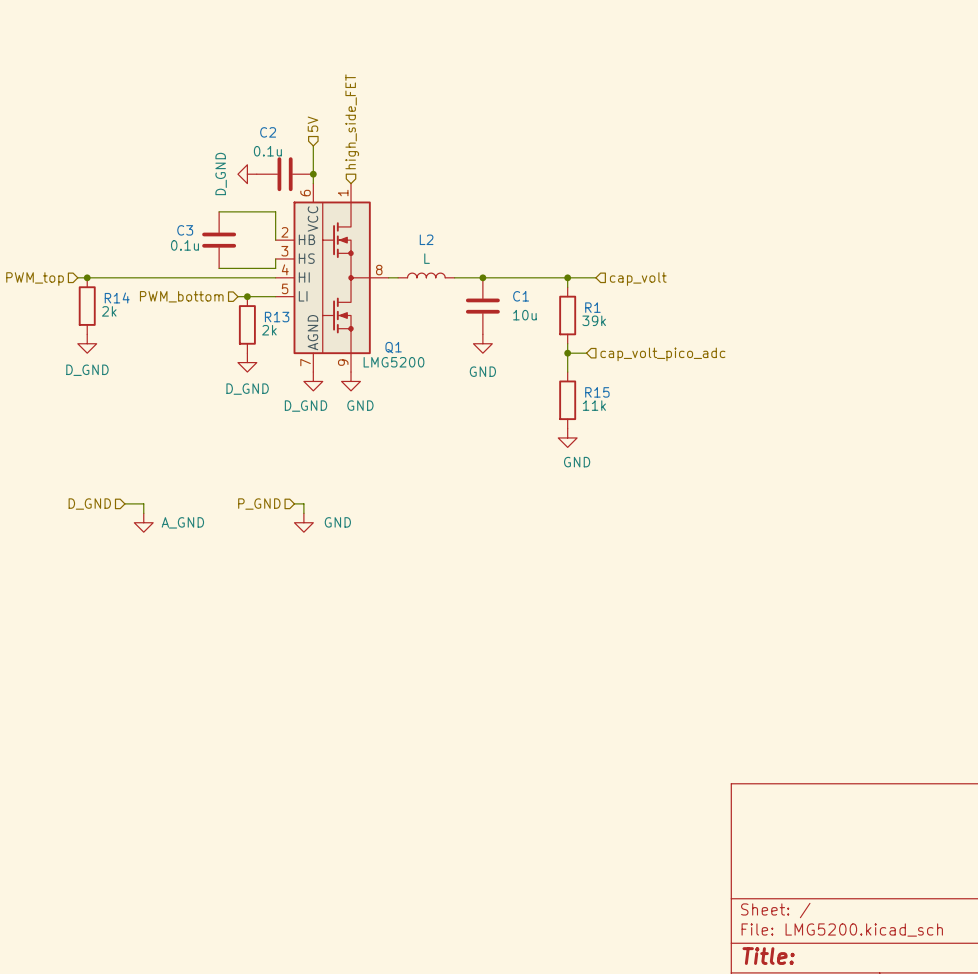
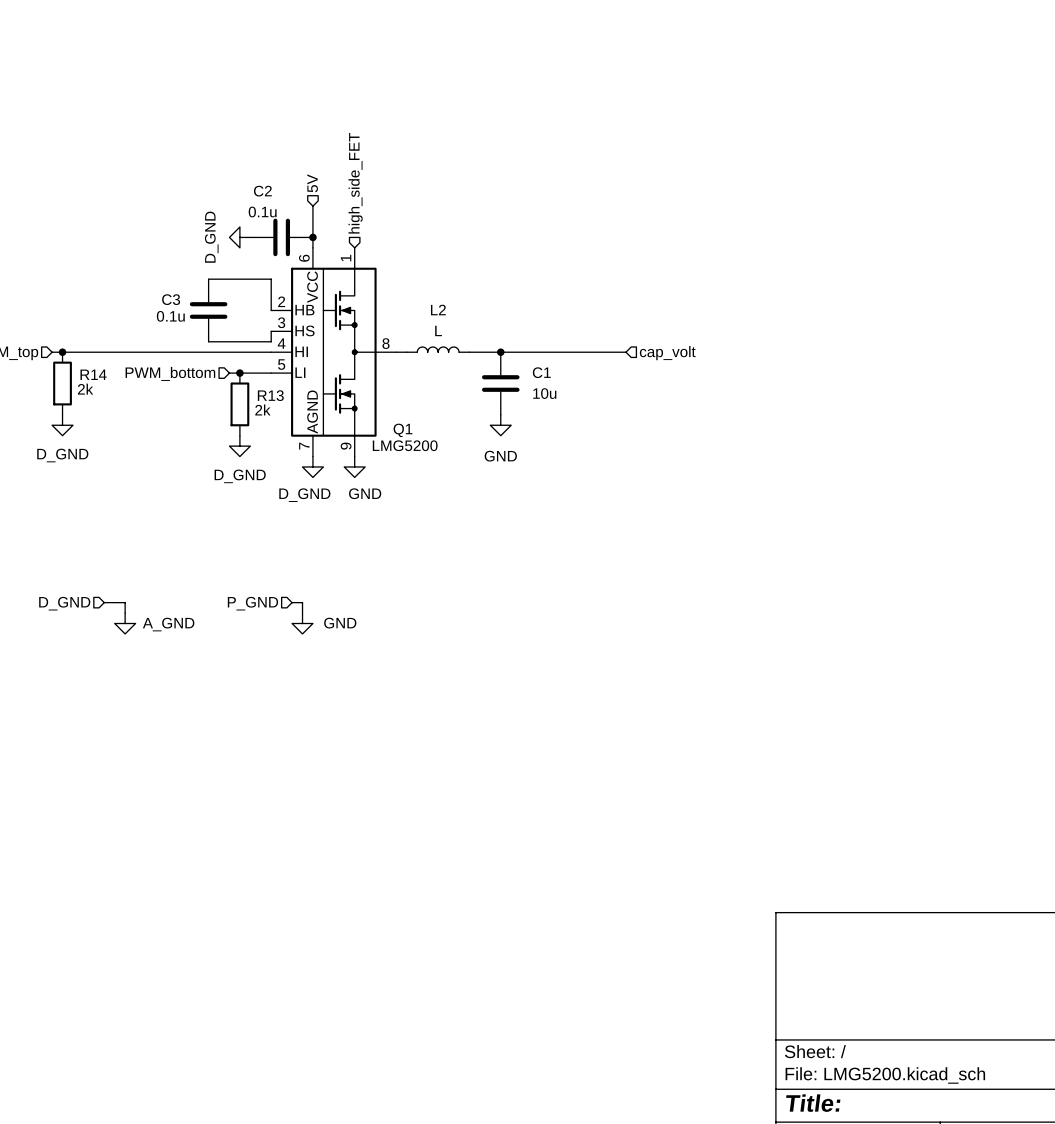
wire: (567, 277) (567, 287) -> none
junction: (567, 277) -> none
R1: 39k (567, 315) -> none
wire: (567, 343) (567, 372) -> none
wire: (567, 353) (586, 353) -> none
junction: (567, 353) -> none
hierarchical label: cap_volt_pico_adc (662, 354) -> none
R15: 11k (567, 400) -> none
power symbol: GND (567, 437) -> none

